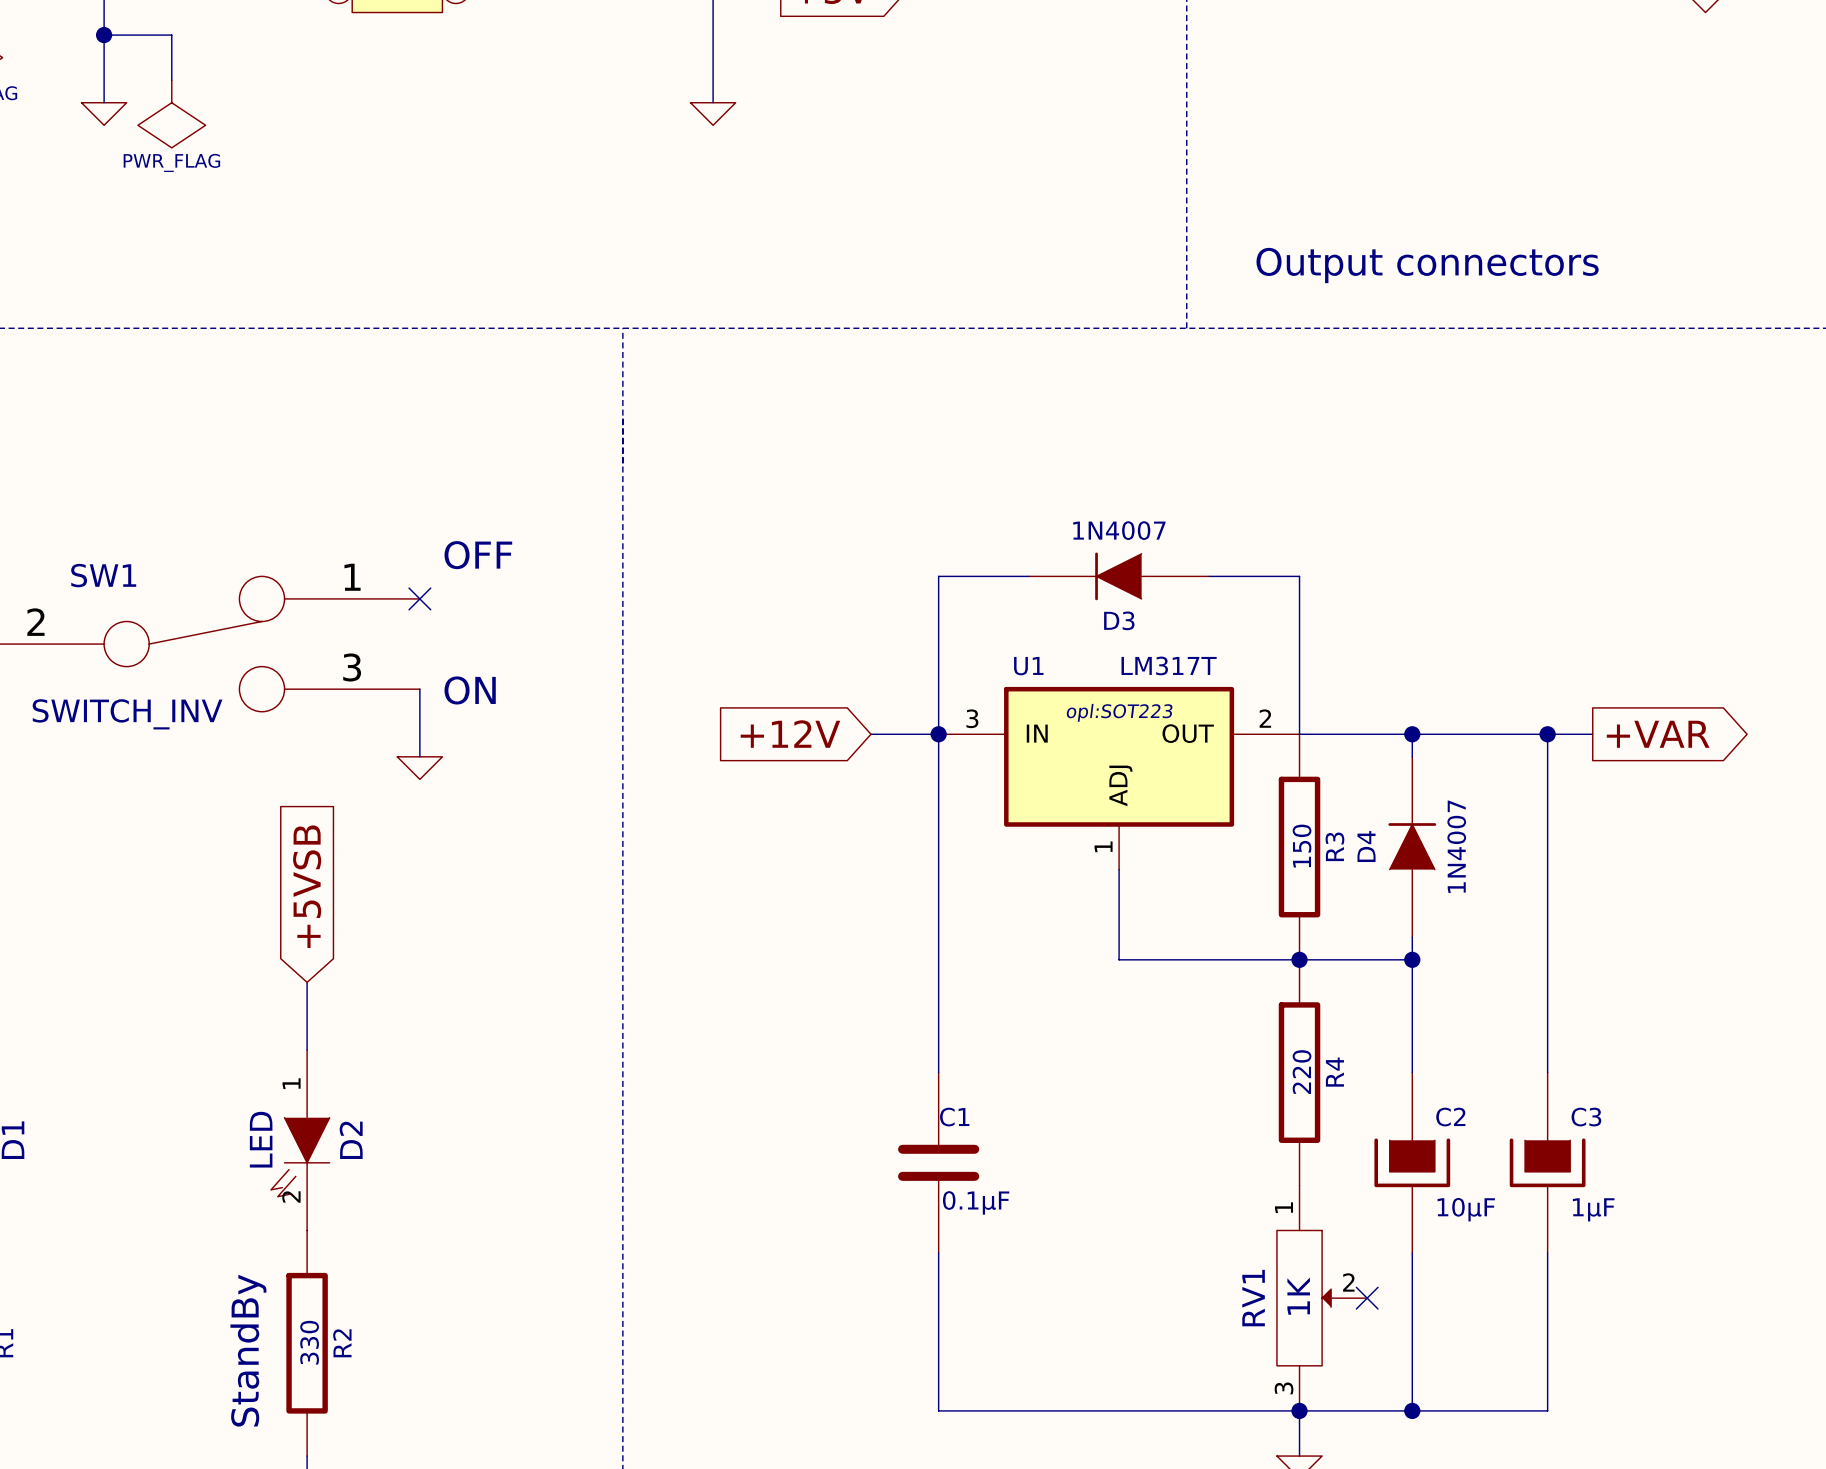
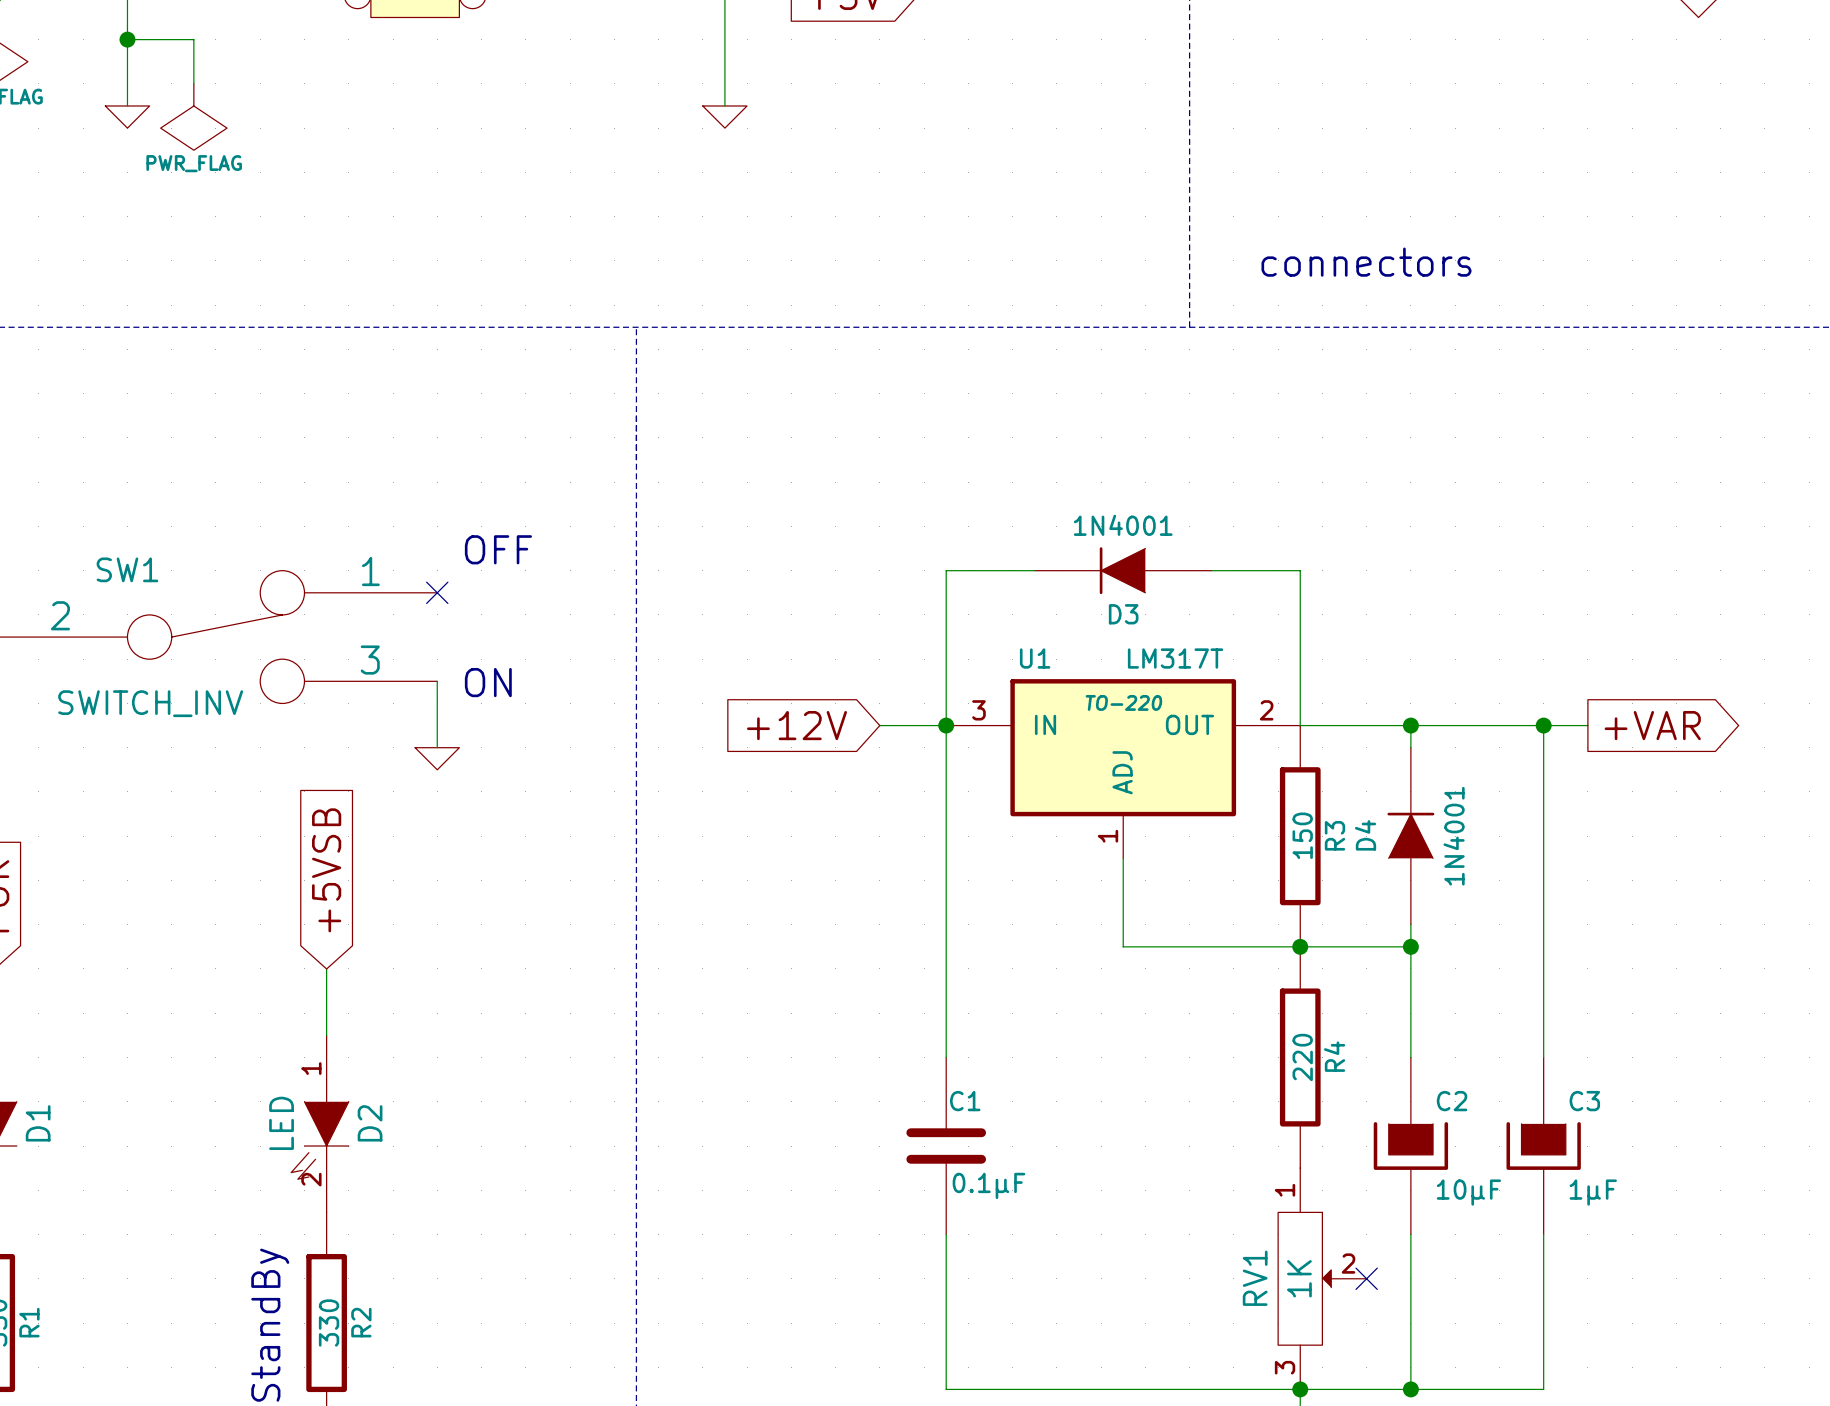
text: Output connectors (1427, 265) -> connectors (1366, 262)
D3 value: 1N4007 (1119, 530) -> 1N4001 (1123, 525)
U1 text: opl:SOT223 (1119, 712) -> TO-220 (1123, 702)
D4 value: 1N4007 (1456, 846) -> 1N4001 (1454, 836)

